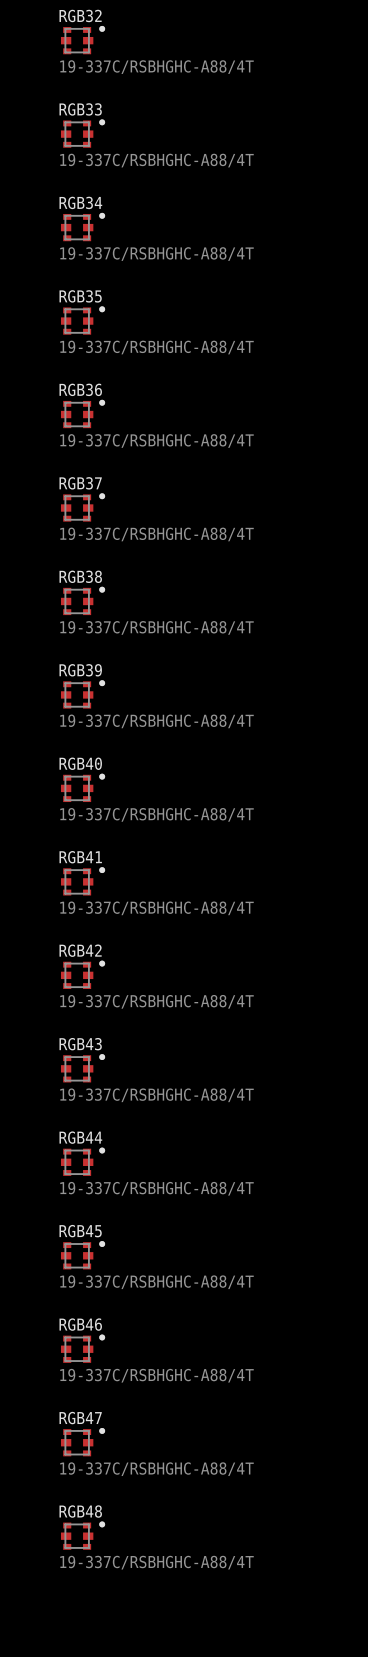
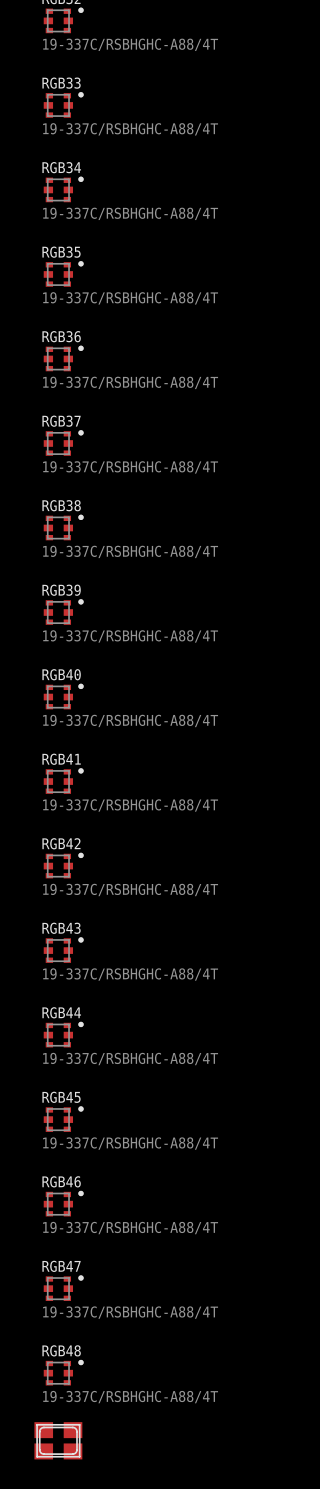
part: none -> (58, 1440)

